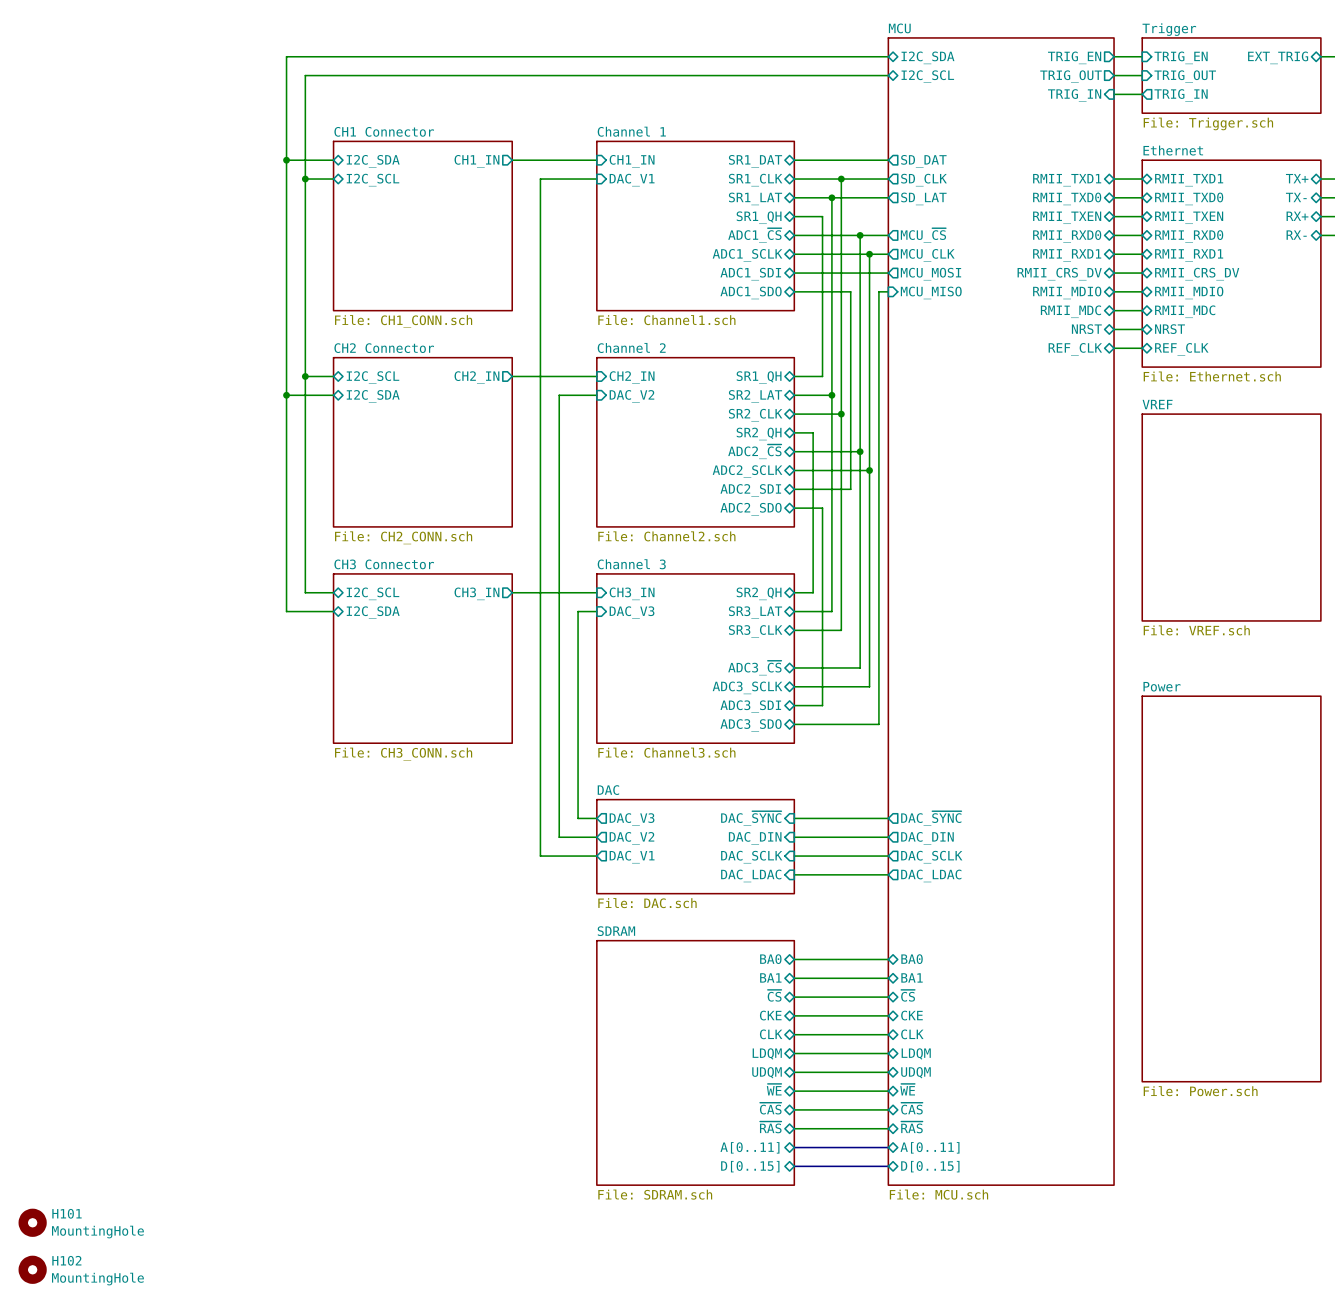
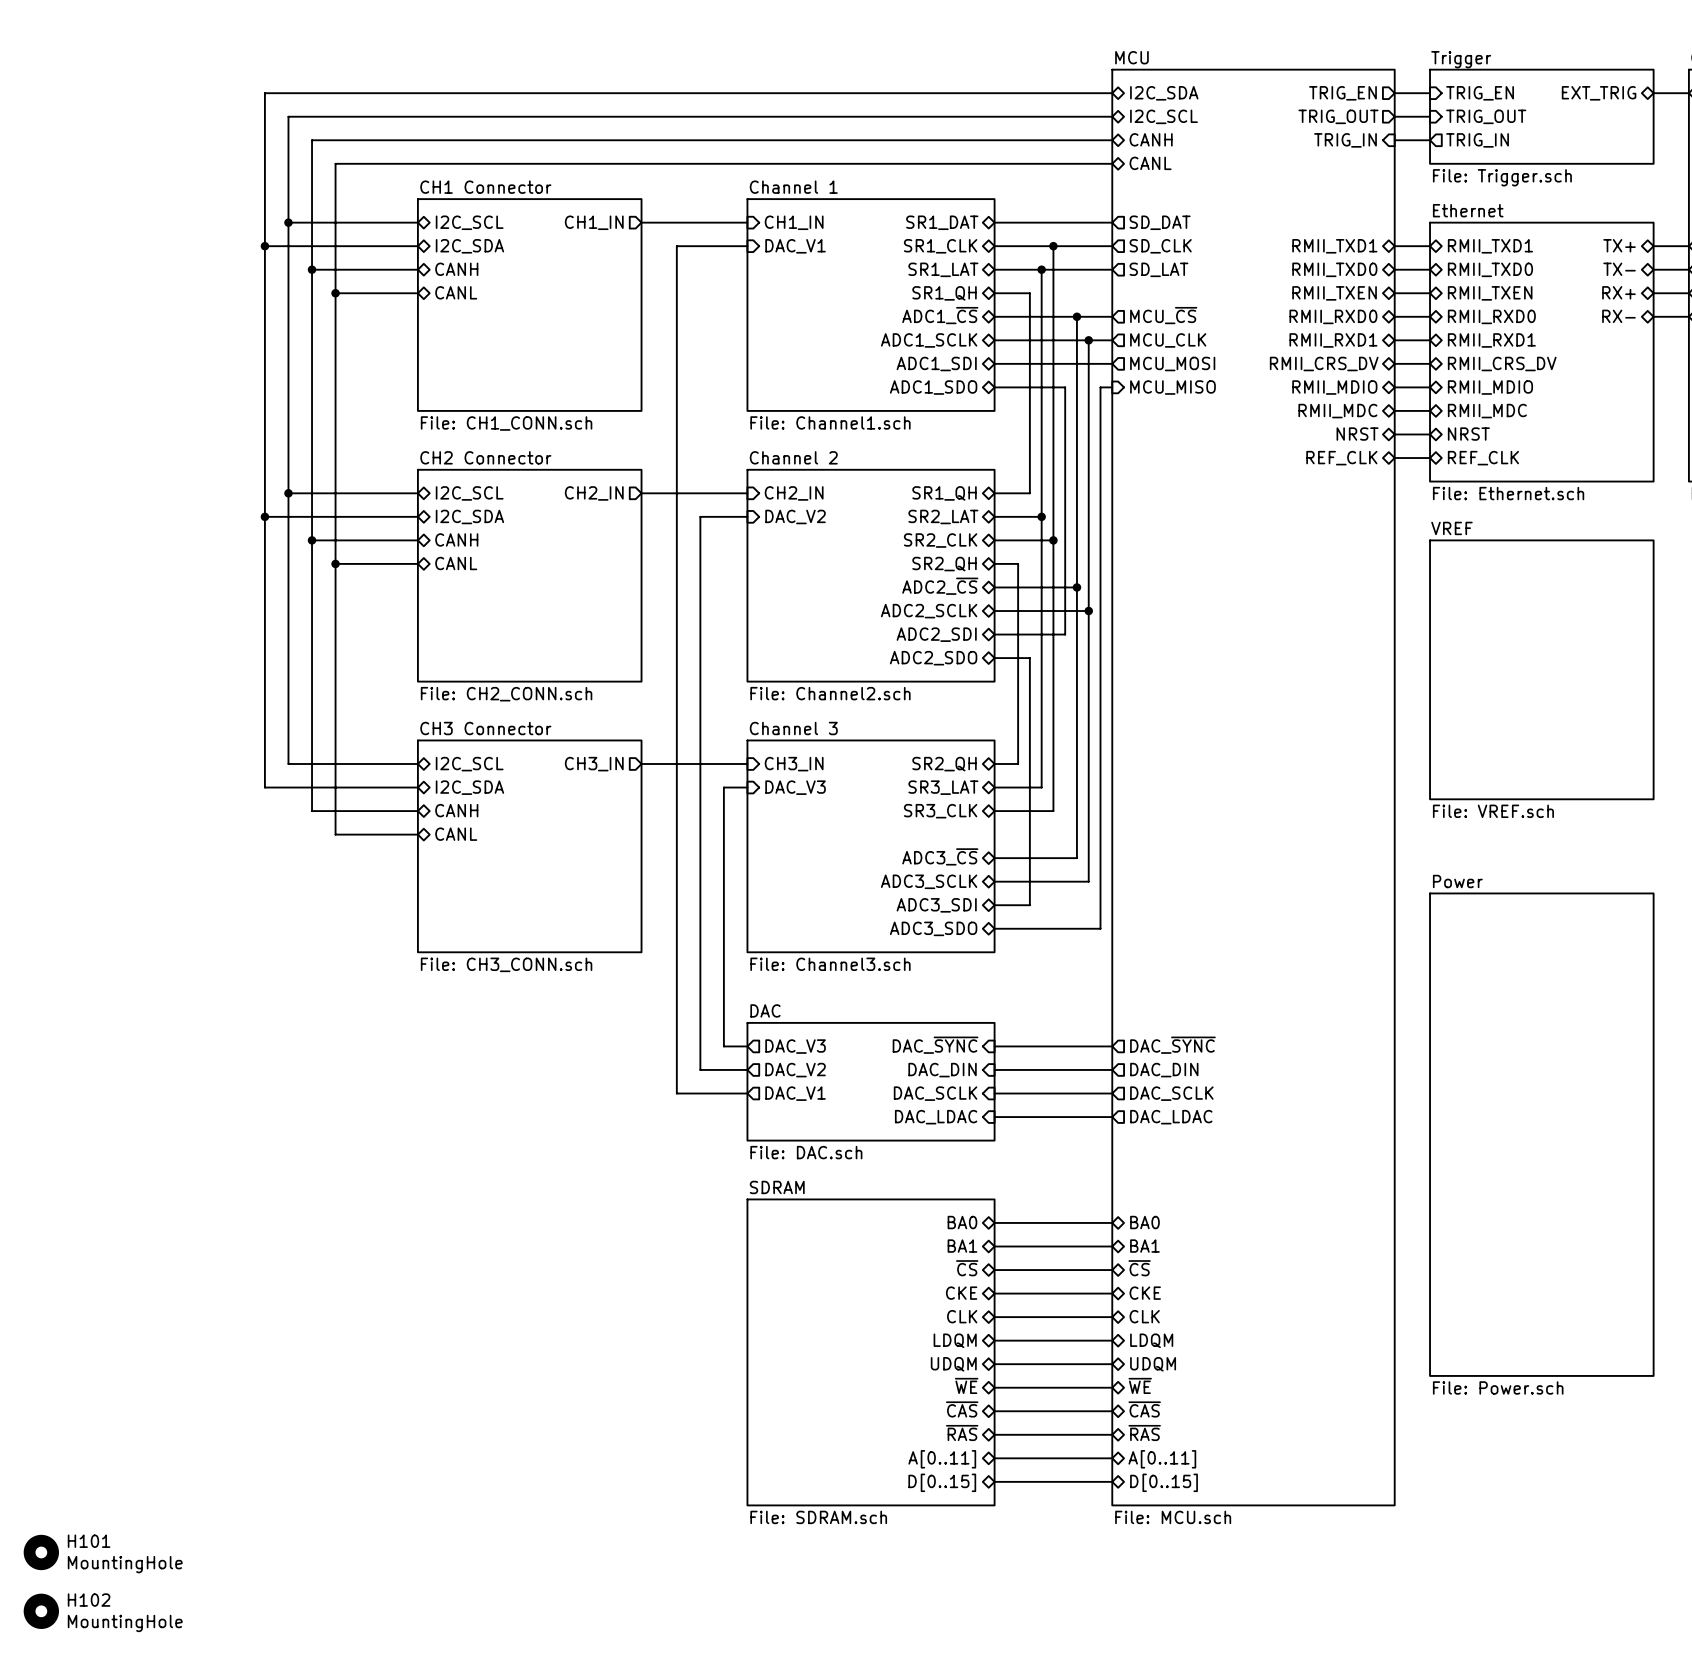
wire: (286, 56) (286, 611) -> (359, 93) (264, 93) (264, 787) (359, 787)
wire: (305, 75) (305, 592) -> (382, 116) (288, 116) (288, 763) (382, 763)
wire: none -> (1112, 140) (312, 140) (312, 811) (417, 811)
sheet pin: none -> CANH (1151, 139)
sheet pin: none -> CANL (1150, 163)
wire: none -> (1112, 163) (335, 163) (335, 834) (417, 834)
wire: none -> (288, 222) (359, 222)
junction: none -> (288, 222)
junction: (286, 160) -> none
sheet pin: I2C_SDA (373, 161) -> I2C_SCL (469, 222)
wire: none -> (264, 246) (382, 246)
junction: none -> (264, 246)
junction: (305, 179) -> none
sheet pin: I2C_SCL (373, 180) -> I2C_SDA (469, 246)
wire: none -> (312, 269) (417, 269)
junction: none -> (312, 269)
sheet pin: none -> CANH (456, 269)
wire: none -> (335, 293) (417, 293)
junction: none -> (335, 293)
sheet pin: none -> CANL (456, 292)
wire: none -> (288, 493) (382, 493)
junction: none -> (288, 493)
junction: (305, 376) -> none
wire: none -> (264, 516) (359, 516)
junction: none -> (264, 516)
junction: (286, 395) -> none
sheet pin: none -> CANH (456, 539)
wire: none -> (312, 540) (417, 540)
junction: none -> (312, 540)
wire: none -> (335, 563) (417, 563)
junction: none -> (335, 563)
sheet pin: none -> CANL (456, 563)
sheet pin: none -> CANH (456, 810)
sheet pin: none -> CANL (456, 834)

